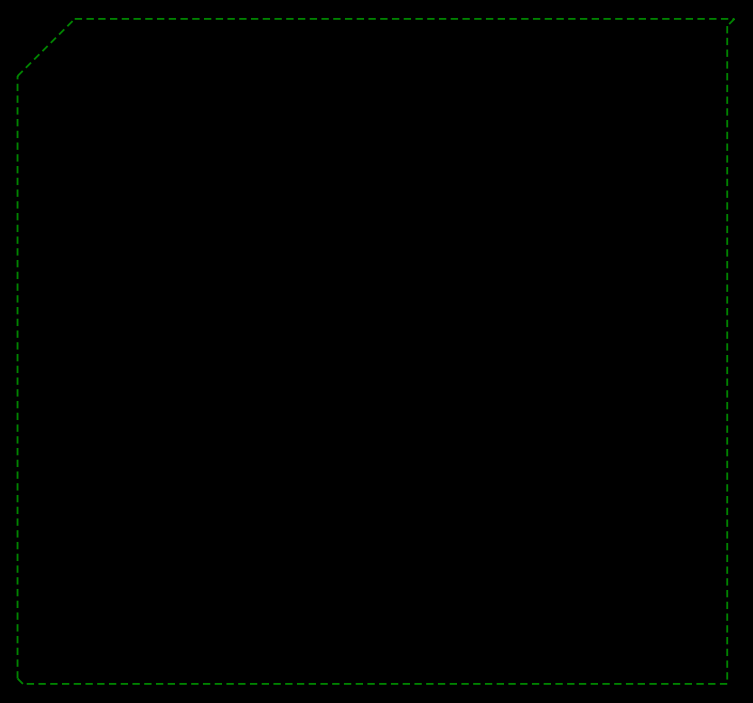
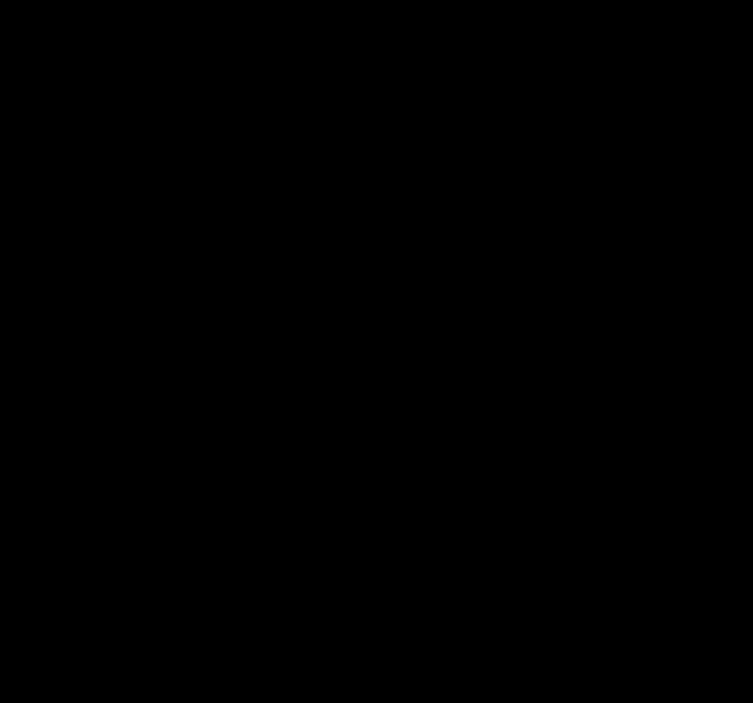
zone outline: (734, 18) (74, 18) (17, 76) (17, 678) (22, 683) (727, 683) (727, 26) (734, 18) -> none

